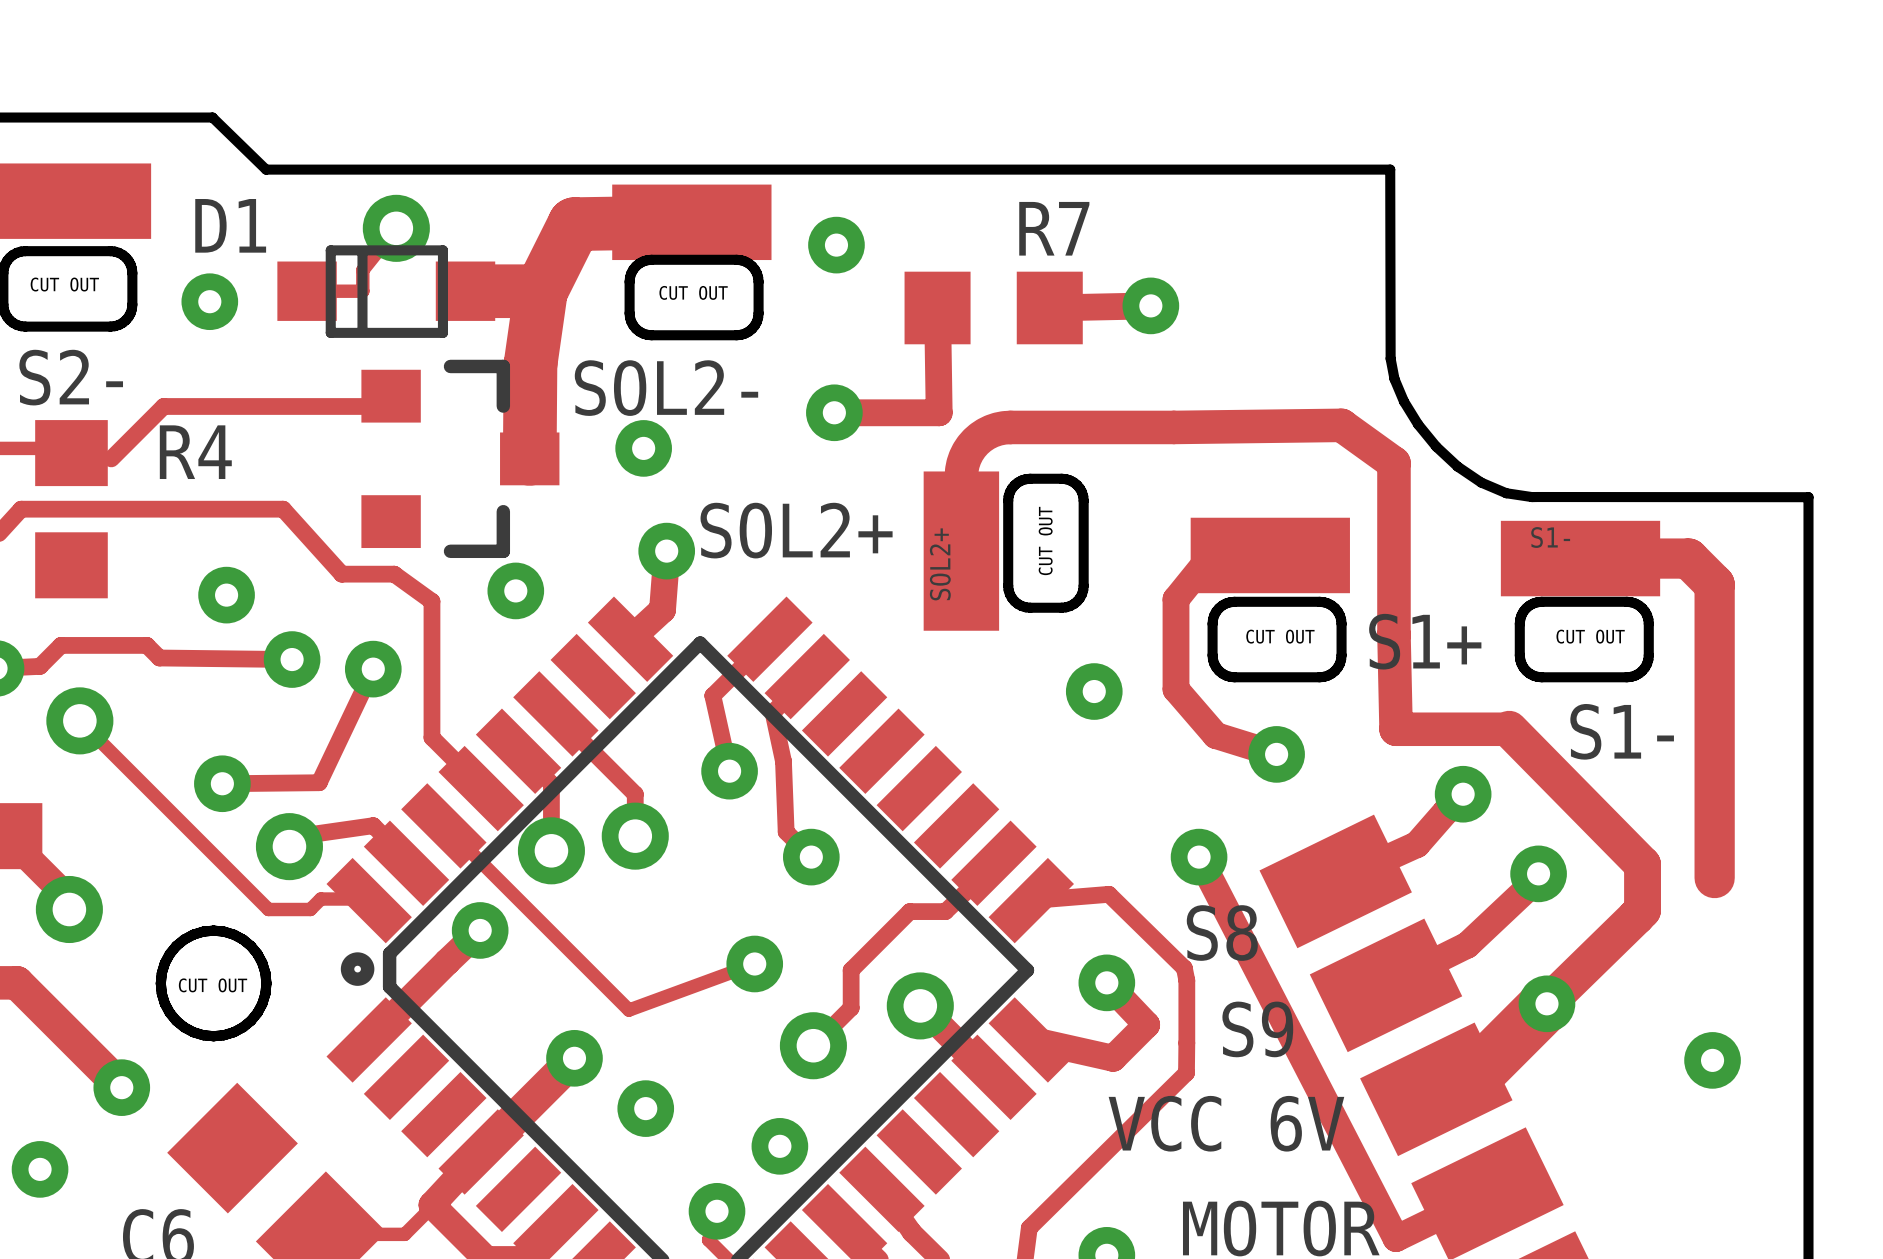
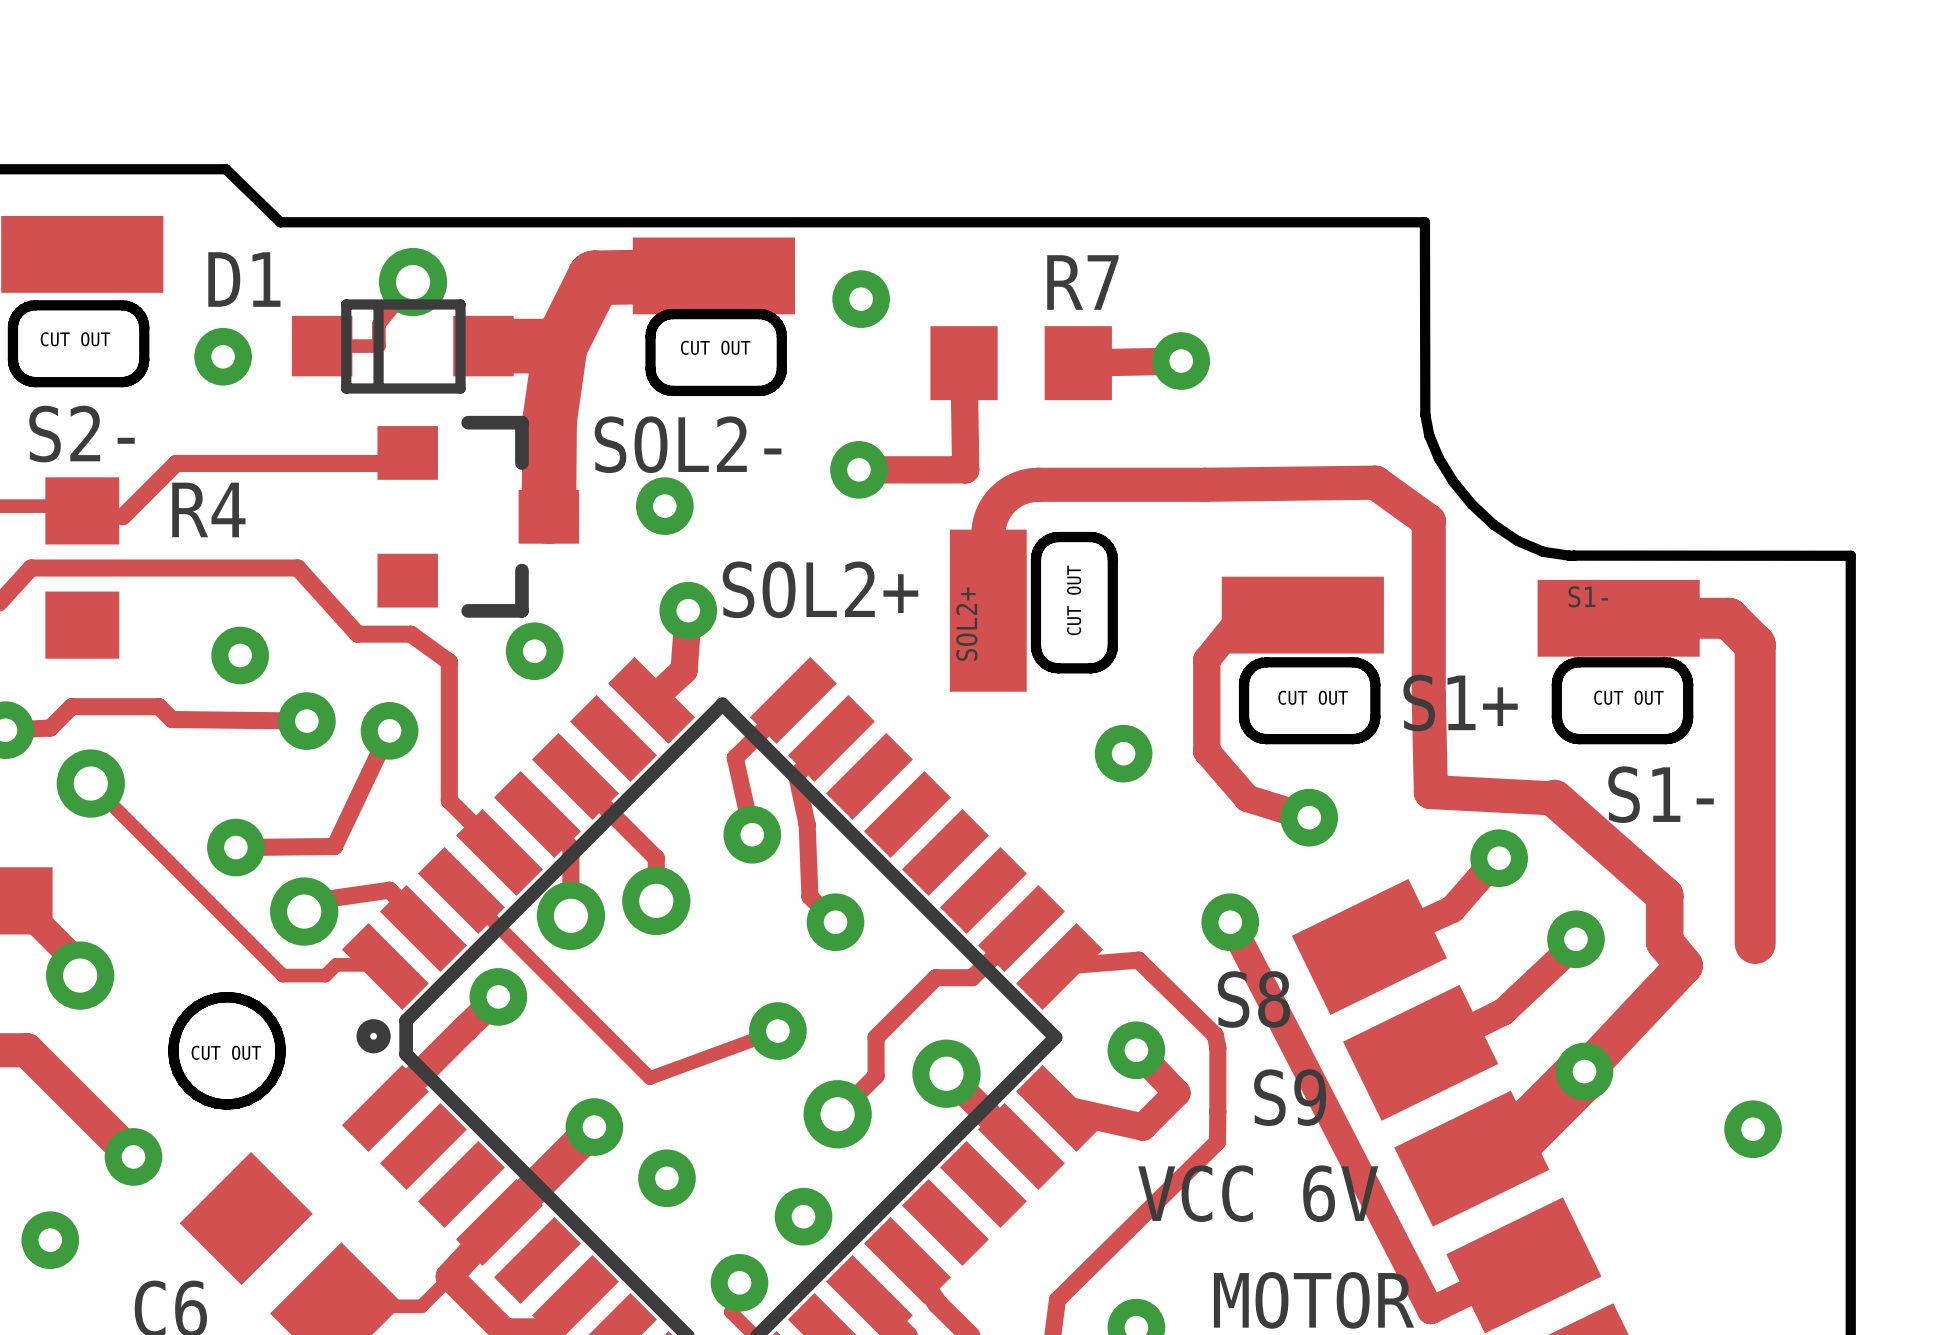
track: (1396, 729) (1509, 729) (1642, 864) (1642, 910) (1546, 1003) -> (1430, 792) (1554, 798) (1664, 895) (1664, 942) (1684, 965) (1584, 1071)

